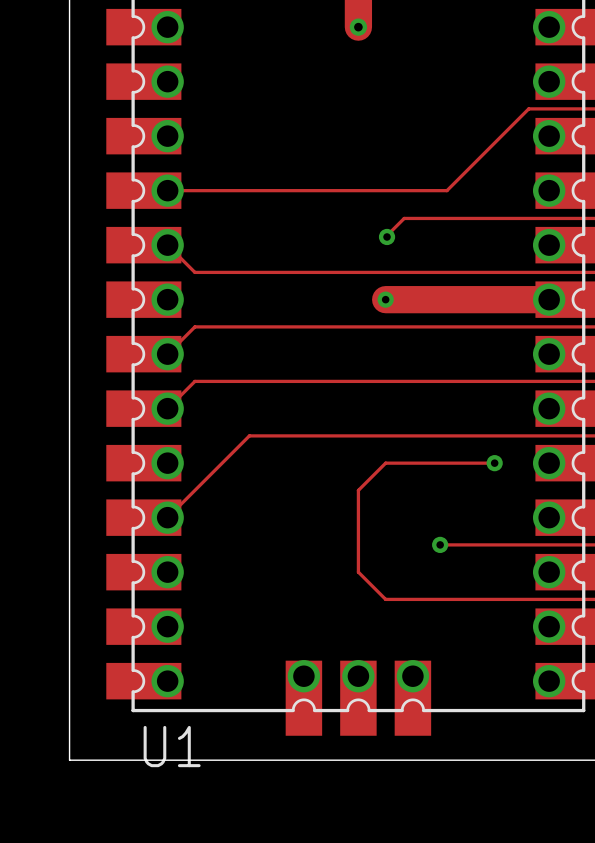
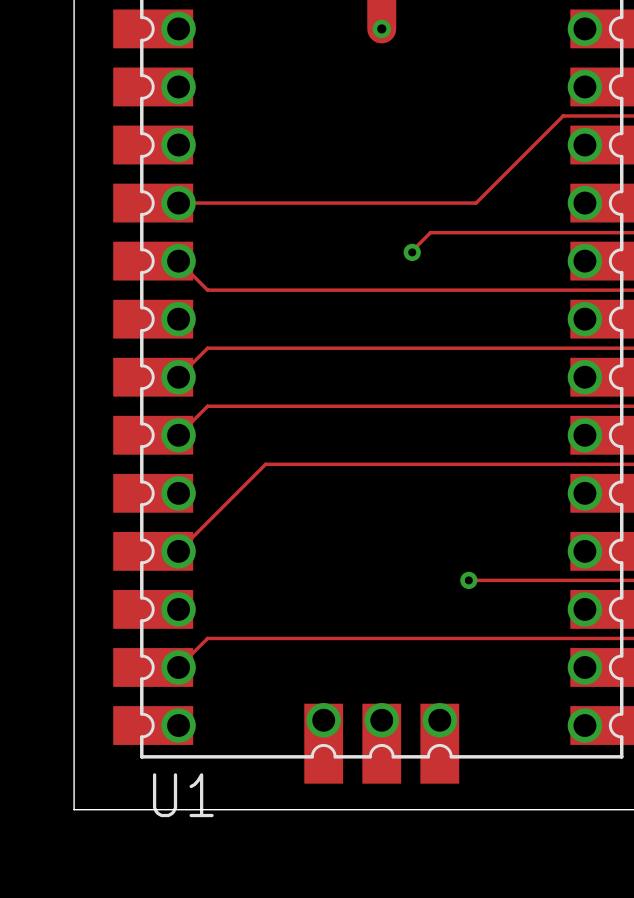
track: (385, 299) (572, 299) -> none
via: (385, 299) -> none
track: (494, 463) (385, 463) (358, 490) (358, 572) (385, 599) -> (153, 667) (178, 667) (207, 638) (410, 638)
via: (494, 463) -> none

